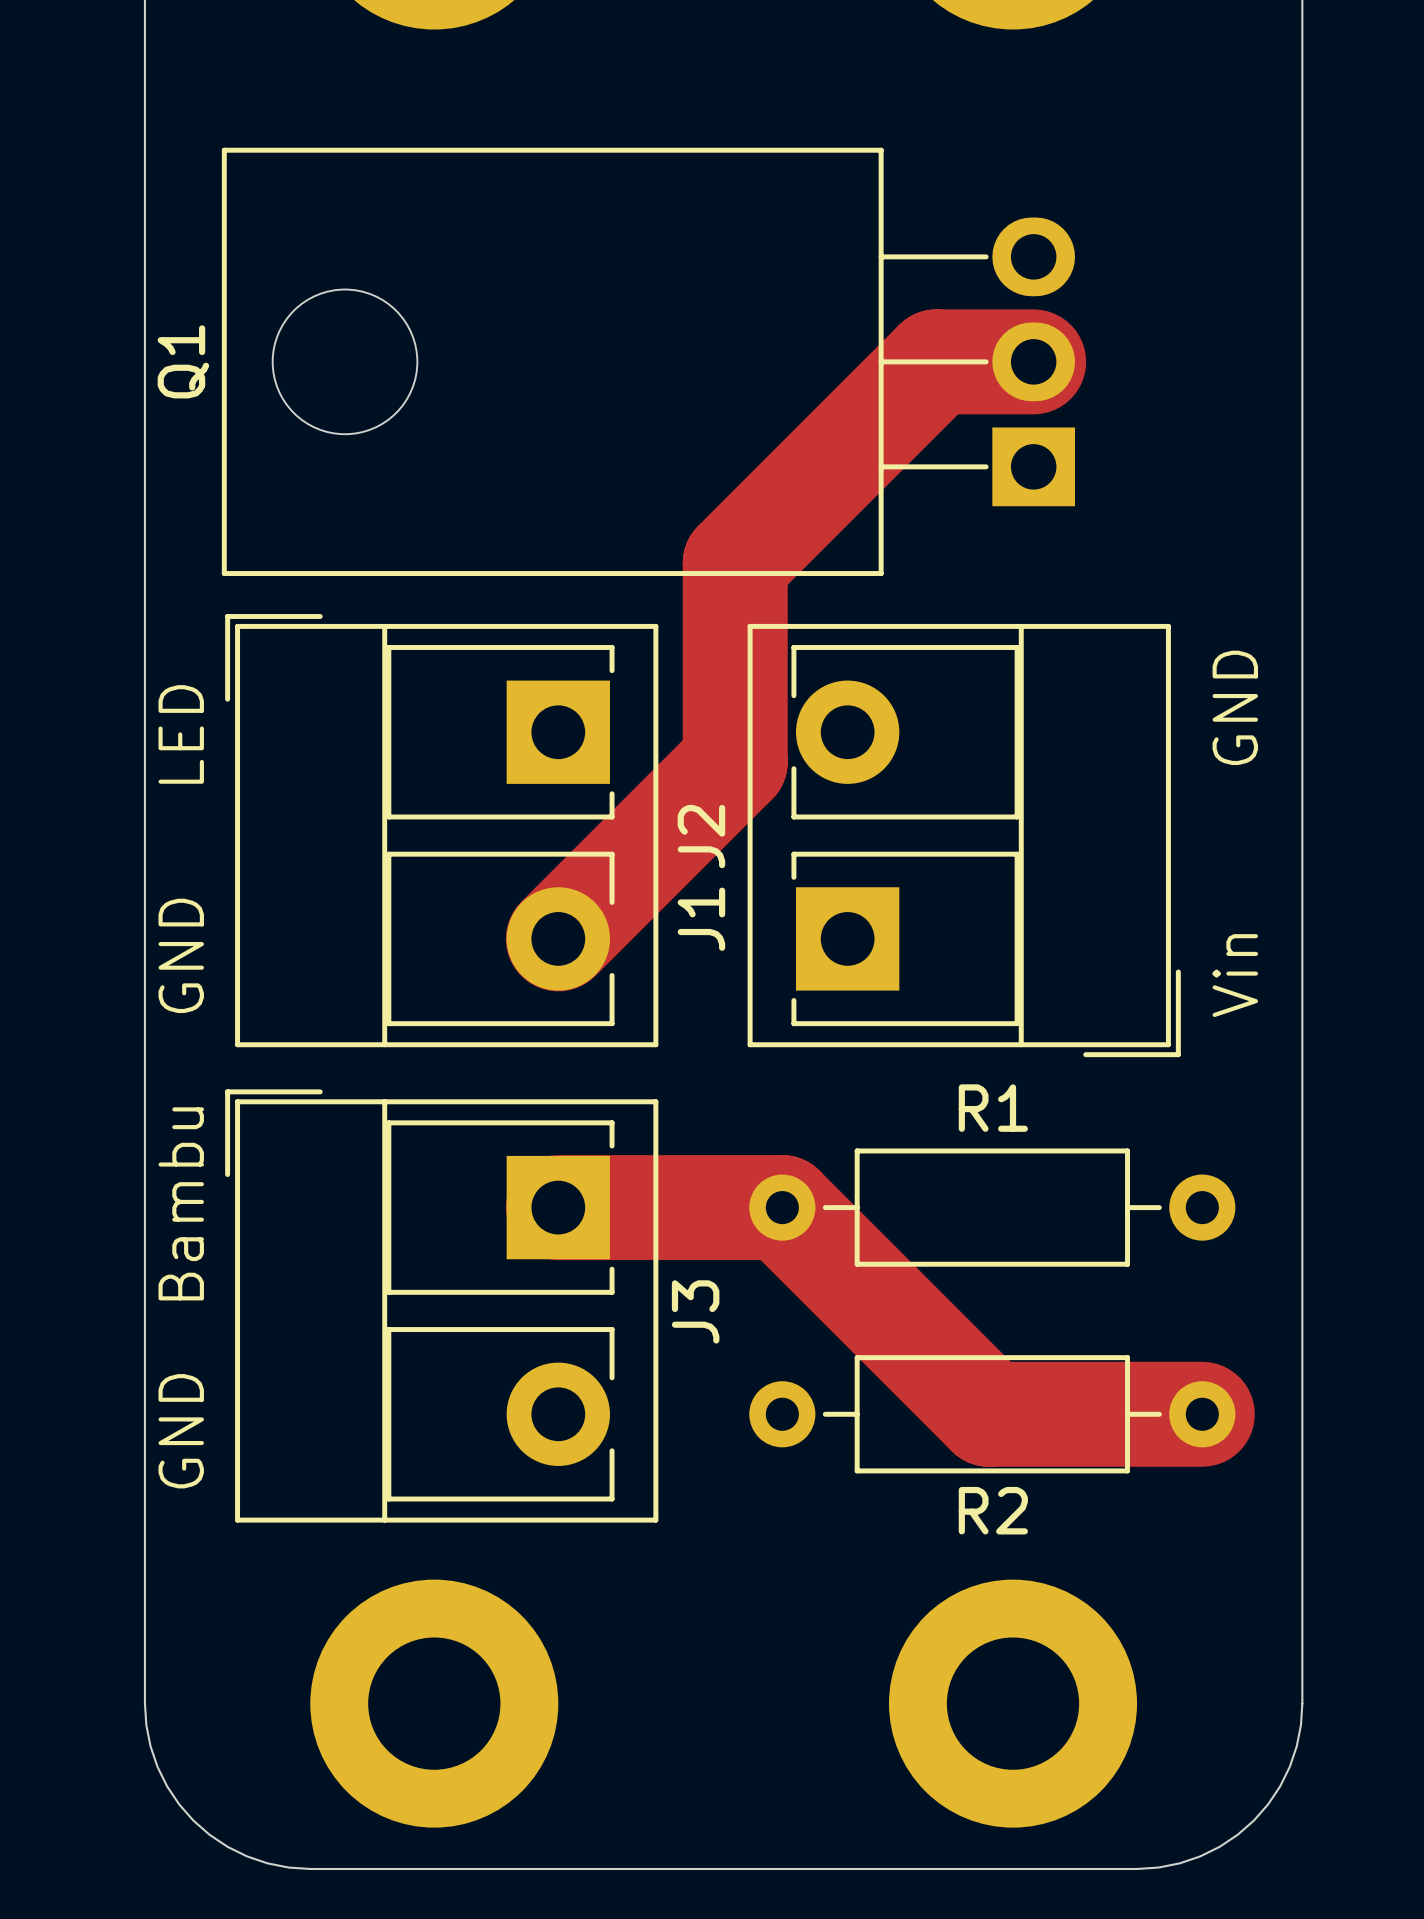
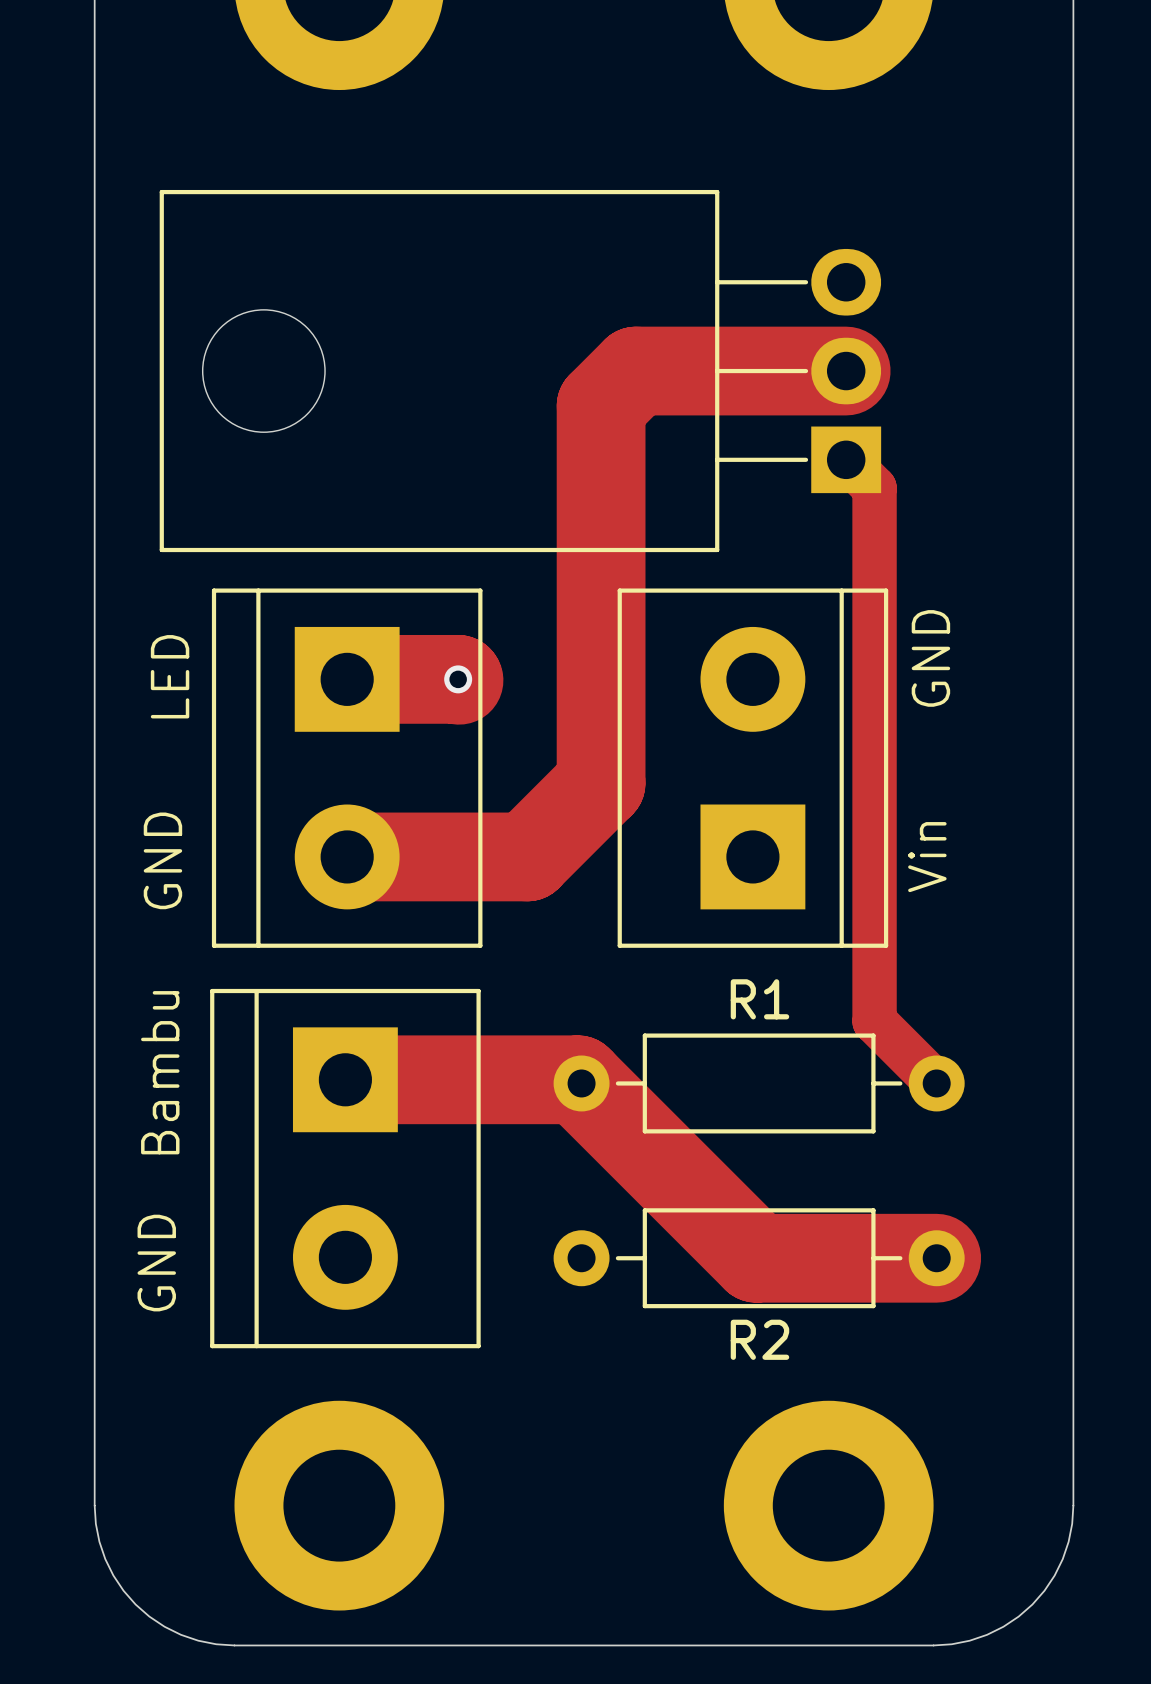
Q1 name: Q1 (183, 361) -> none
track: (936, 361) (735, 563) (735, 761) (558, 938) -> (763, 371) (636, 371) (601, 405) (601, 783) (527, 856) (347, 856)
track: none -> (846, 459) (874, 488) (874, 1021) (936, 1083)
text position: GND (1235, 707) -> GND (930, 658)
track: none -> (347, 679) (459, 680)
via: none -> (458, 679)
text position: LED (181, 734) -> LED (170, 676)
J1: (441, 830) -> none
part: none -> (347, 768)
part: none -> (752, 768)
J2: (964, 840) -> none
text position: GND (181, 955) -> GND (162, 860)
text position: Vin (1235, 975) -> Vin (927, 857)
track: none -> (345, 1079) (577, 1079) (756, 1258) (936, 1258)
text position: Bambu (181, 1203) -> Bambu (160, 1072)
track: (558, 1207) (782, 1207) (989, 1414) (1202, 1414) -> none
R1 position: (992, 1207) -> (759, 1083)
J3: (441, 1305) -> none
part: none -> (345, 1168)
R2 position: (992, 1414) -> (759, 1258)
text position: GND (181, 1431) -> GND (156, 1263)

